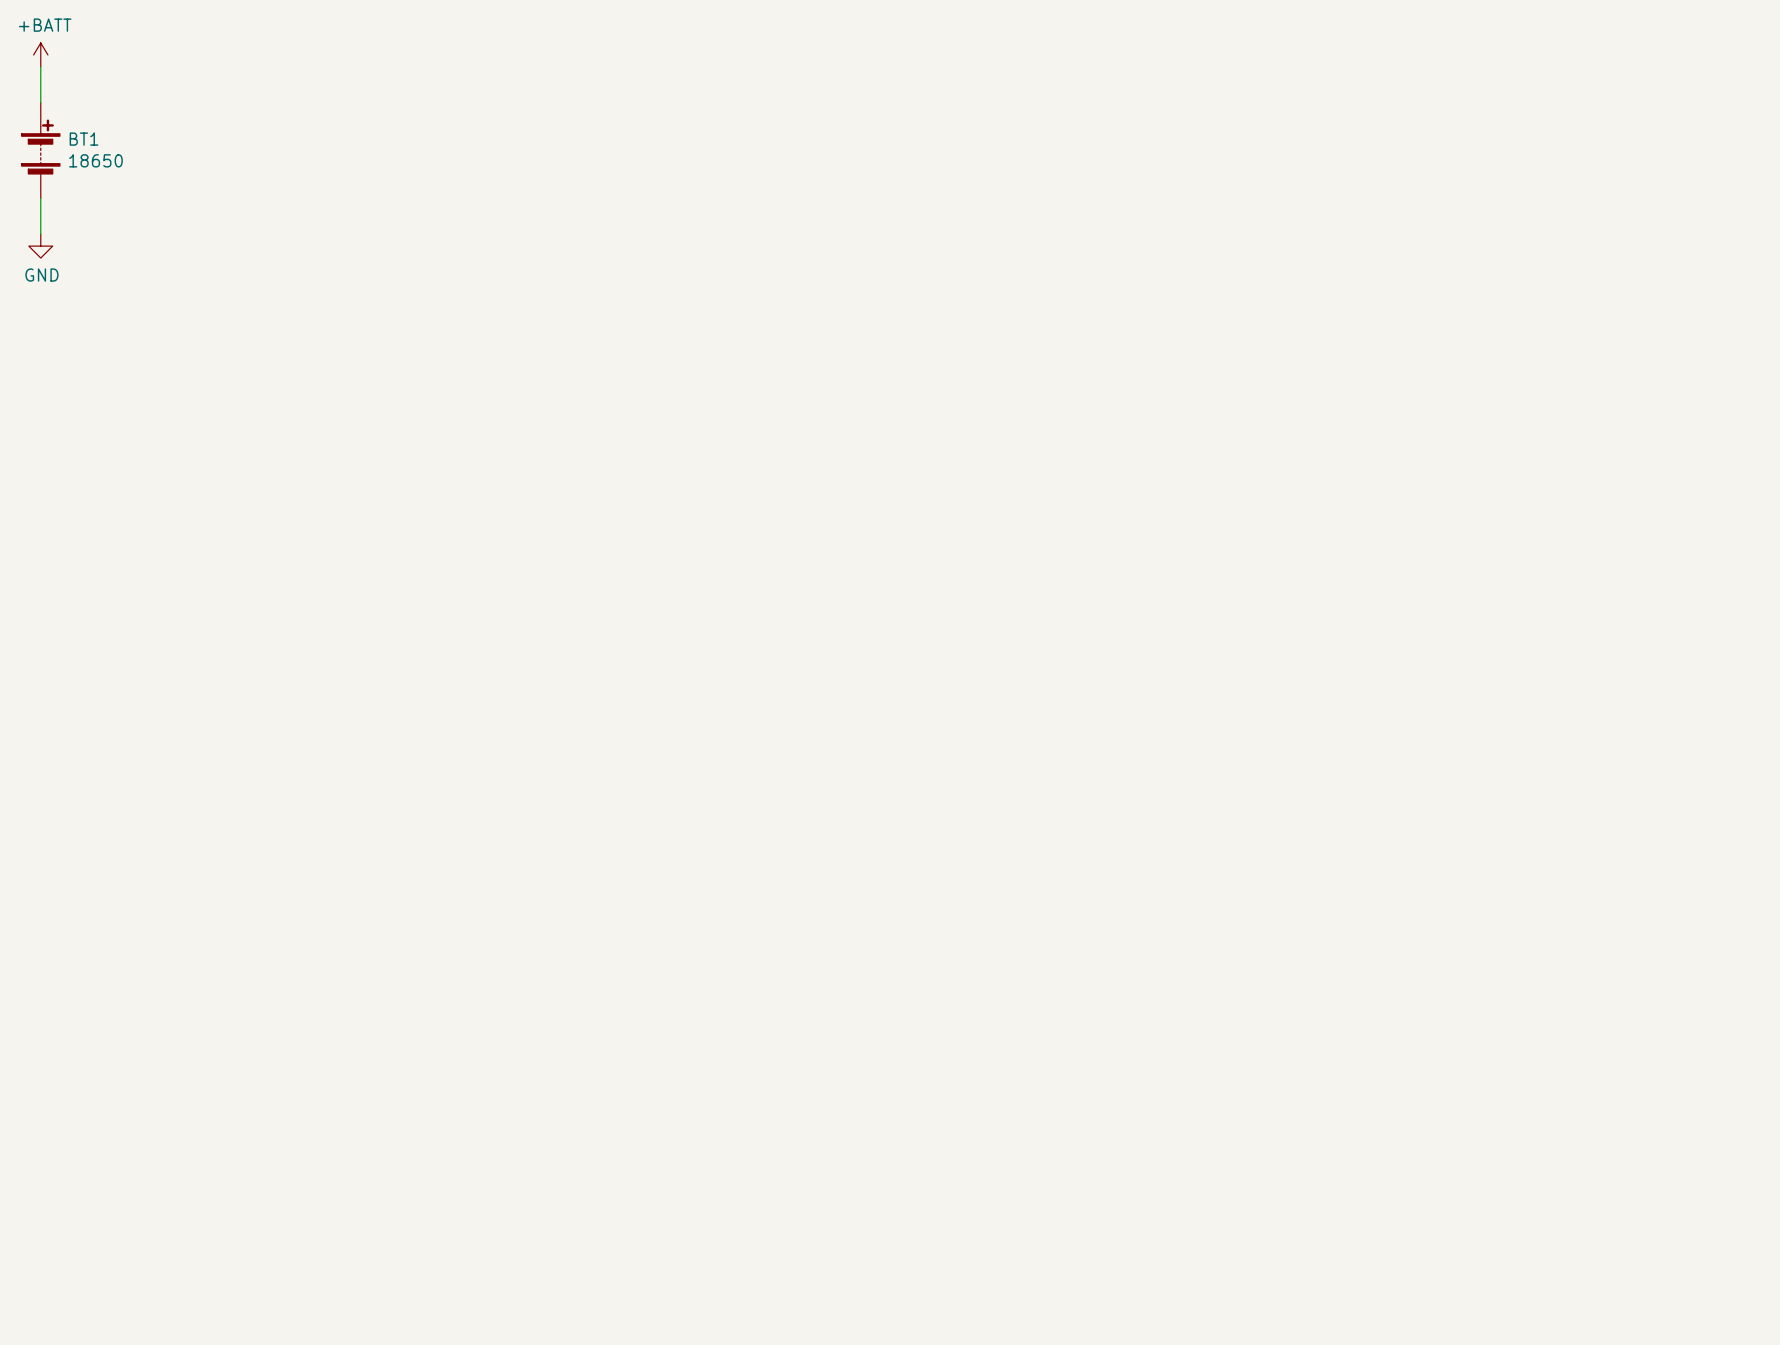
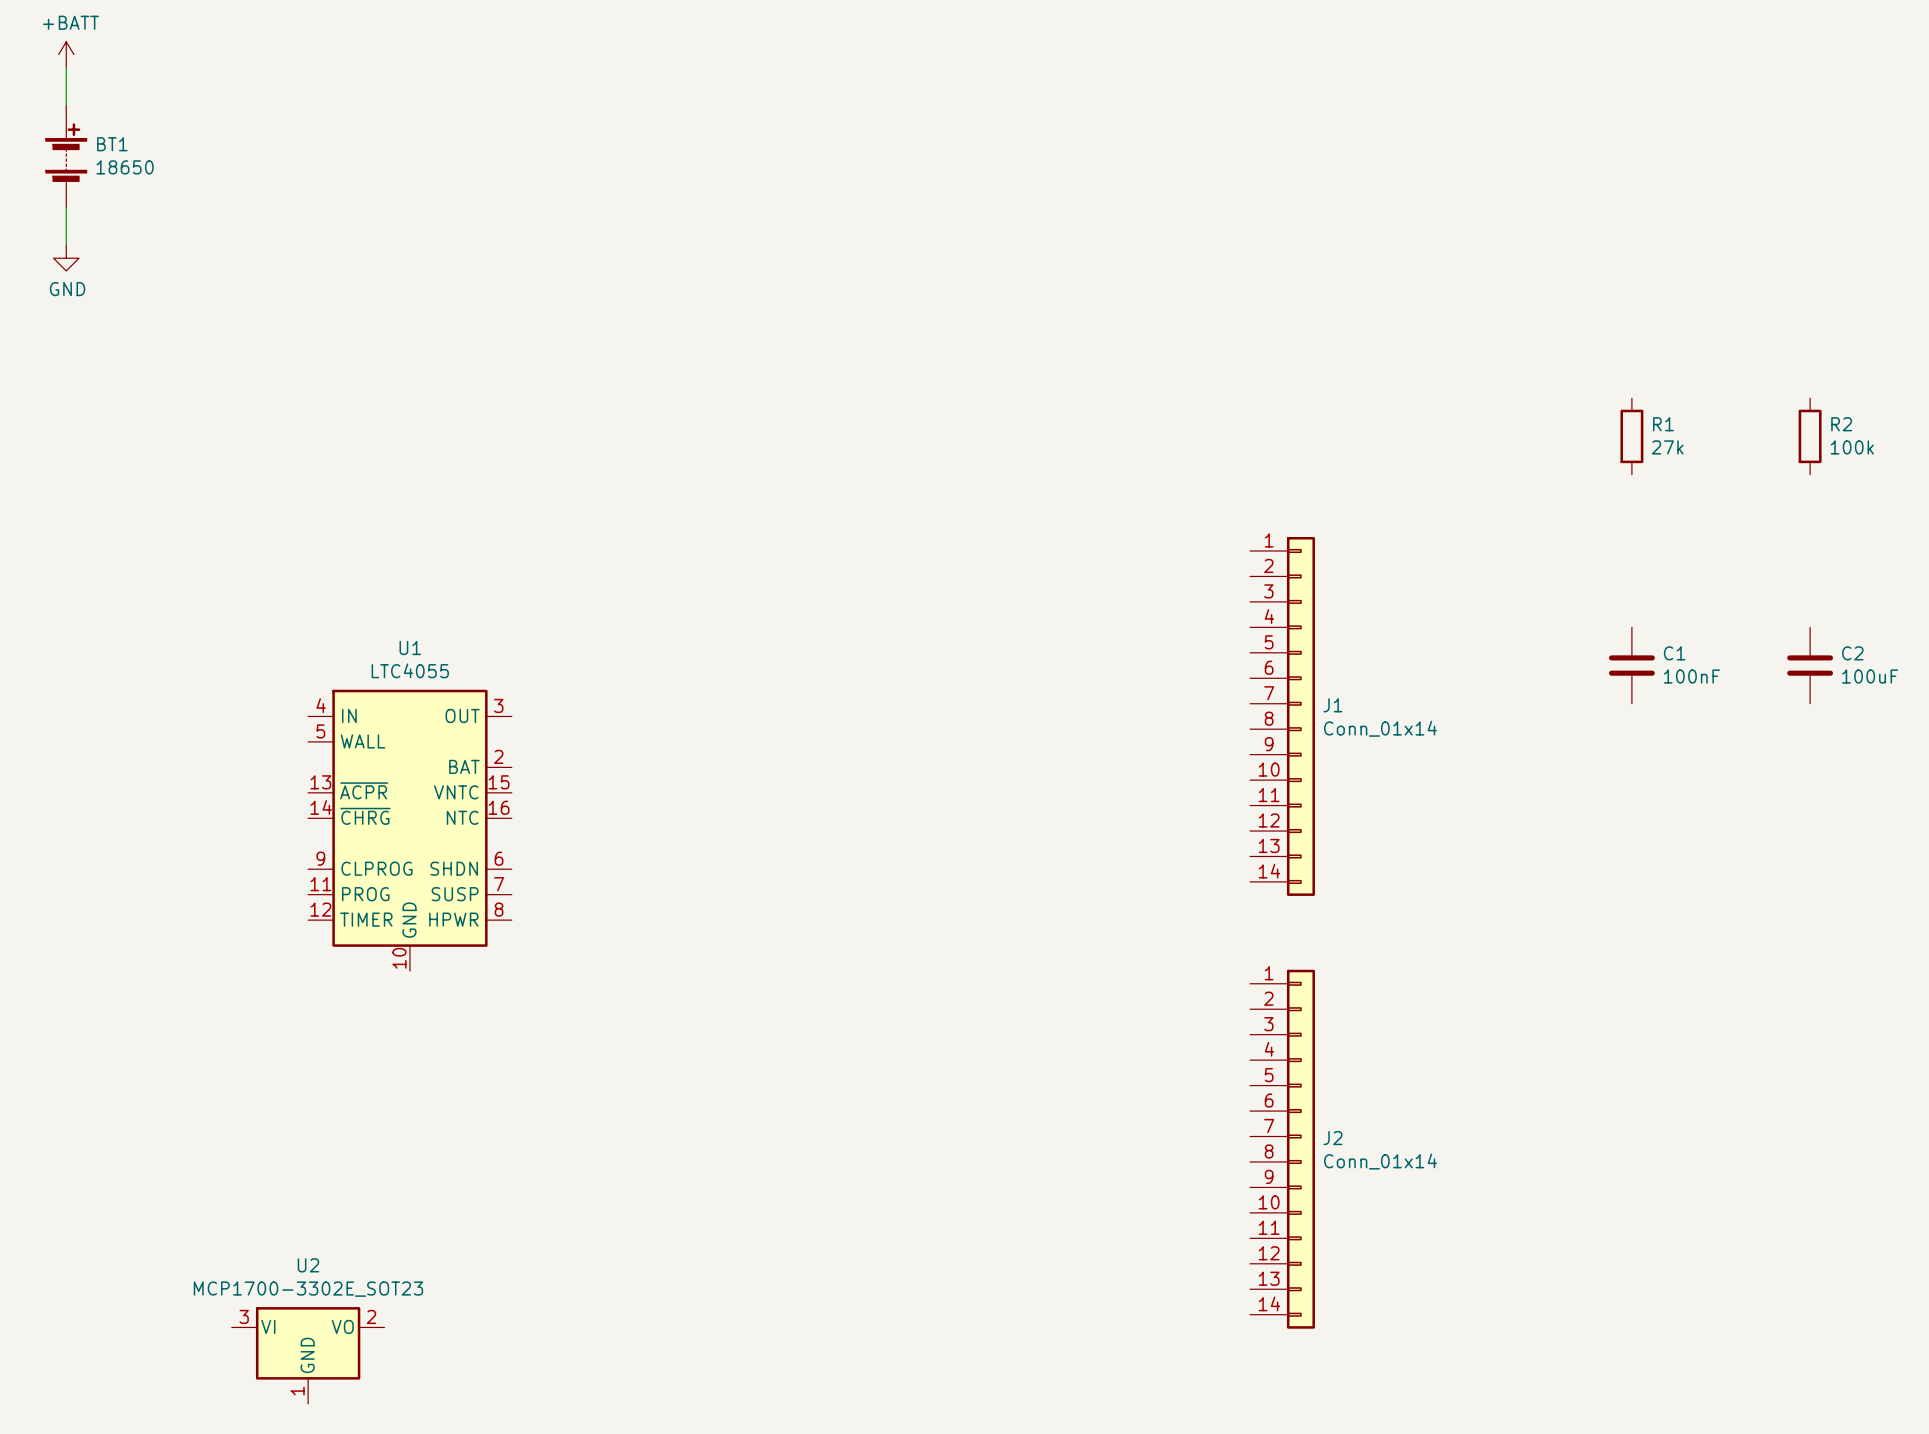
R1: none -> 27k (1631, 436)
R2: none -> 100k (1810, 436)
C1: none -> 100nF (1631, 665)
C2: none -> 100uF (1810, 665)
J1: none -> Conn_01x14 (1282, 716)
U1: none -> LTC4055 (409, 830)
J2: none -> Conn_01x14 (1282, 1149)
U2: none -> MCP1700-3302E_SOT23 (308, 1355)

